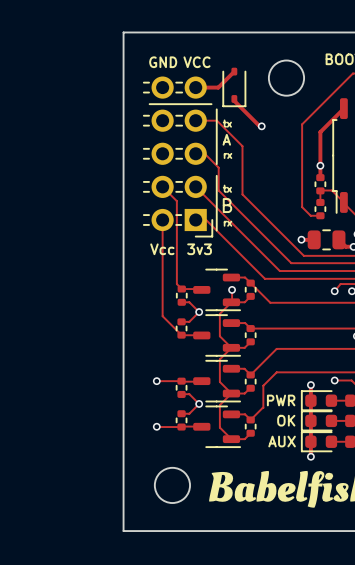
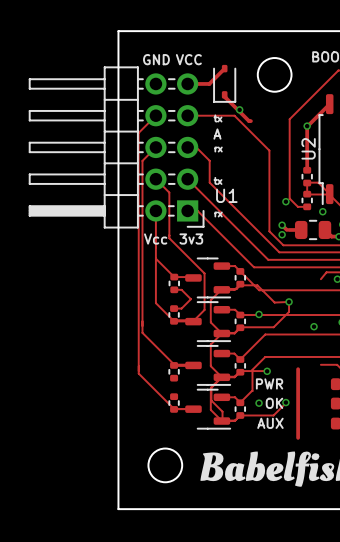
line: (149, 104) (211, 104) -> none
line: (216, 109) (216, 164) -> none
track: none -> (155, 115) (138, 132) (138, 373) (174, 409) (194, 408)
track: (216, 120) (242, 146) (242, 194) (303, 255) -> (208, 115) (234, 115) (269, 150) (269, 231) (283, 245) (291, 245)
via position: (261, 126) -> (239, 109)
via: none -> (307, 126)
part: none -> (116, 147)
track: none -> (155, 147) (142, 160) (142, 332) (174, 364) (193, 364)
U2 name: none -> U2 (308, 148)
part: (178, 156) -> none
via: (320, 165) -> none
line: (216, 175) (216, 230) -> none
track: (176, 200) (176, 284) -> (169, 192) (169, 238) (204, 273) (204, 309) (193, 321) (174, 320)
track: none -> (307, 194) (329, 194)
text: B (227, 205) -> U1 (226, 195)
via: none -> (285, 201)
via: none -> (322, 211)
track: none -> (282, 225) (286, 229)
via: none -> (282, 225)
via: (301, 239) -> none
via: none -> (282, 234)
track: (232, 289) (232, 301) (219, 313) -> (221, 332) (234, 332) (240, 327) (273, 327) (289, 311) (289, 301) (274, 302) (257, 285) (240, 285) (236, 289) (221, 289) (210, 300)
via: (232, 289) -> none
via: (334, 291) -> none
via: (199, 312) -> none
via: none -> (289, 301)
via: none -> (259, 314)
via: none -> (314, 326)
via: (334, 380) -> none
track: (156, 381) (181, 381) -> none
via: (156, 381) -> none
via: (310, 385) -> none
track: none -> (266, 371) (240, 371) (234, 376) (221, 376) (211, 387) (211, 400) (222, 411) (222, 420) (235, 420) (240, 415) (273, 415) (285, 402)
via: none -> (267, 371)
track: (181, 394) (189, 394) (199, 403) (189, 413) (181, 413) -> none
part: (319, 400) -> none
track: (331, 400) (350, 400) -> none
via: (199, 403) -> none
via: none -> (285, 402)
via: none -> (259, 403)
part: (319, 420) -> none
track: (331, 420) (350, 420) -> none
track: (156, 426) (181, 427) -> none
via: (156, 426) -> none
part: (319, 441) -> none
track: (331, 441) (350, 441) -> none
via: (310, 456) -> none

